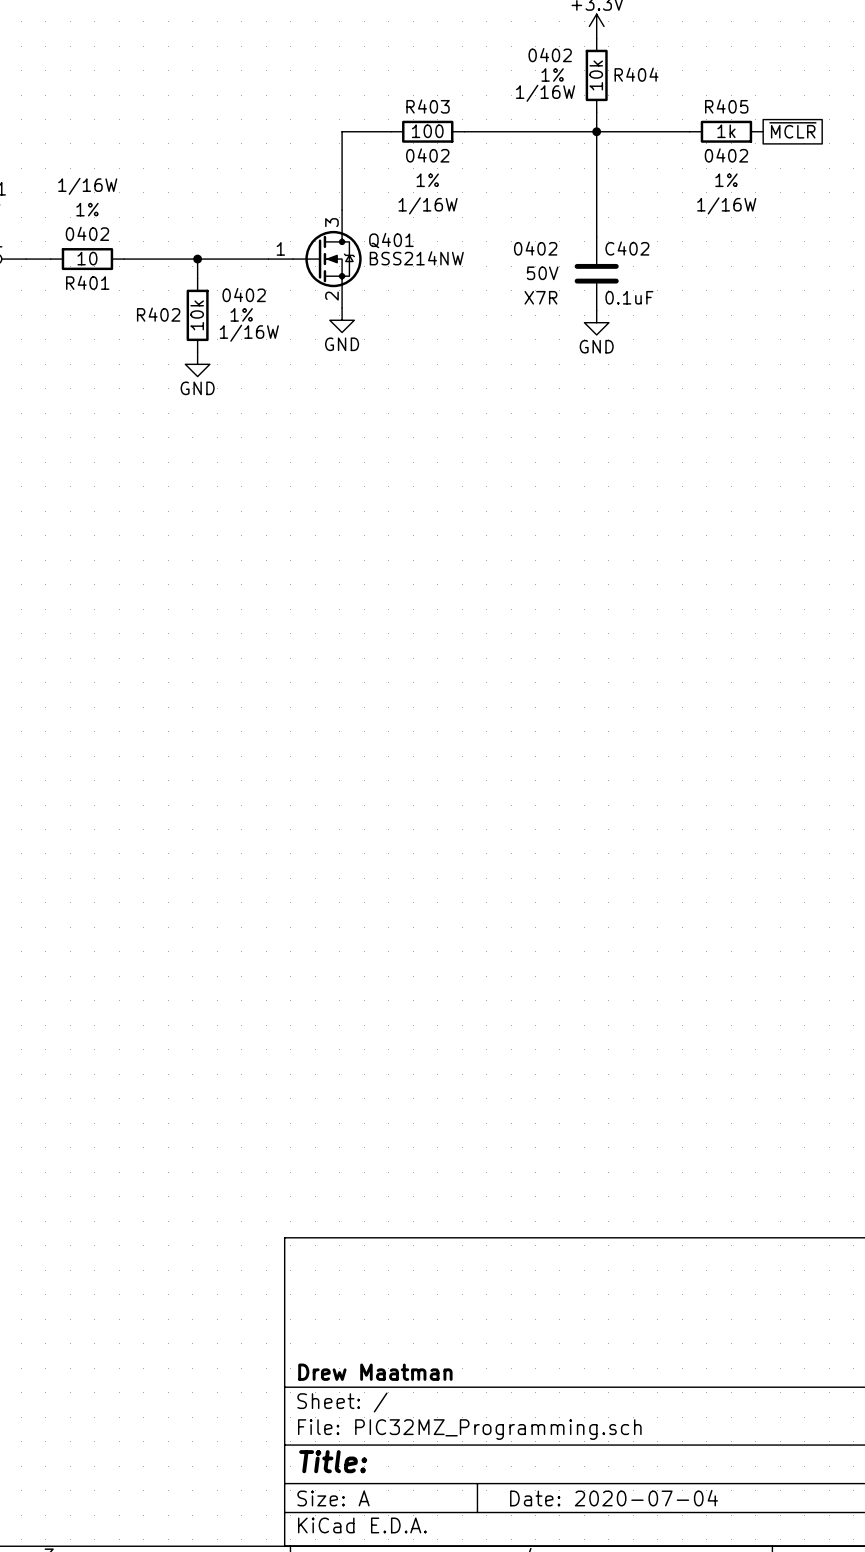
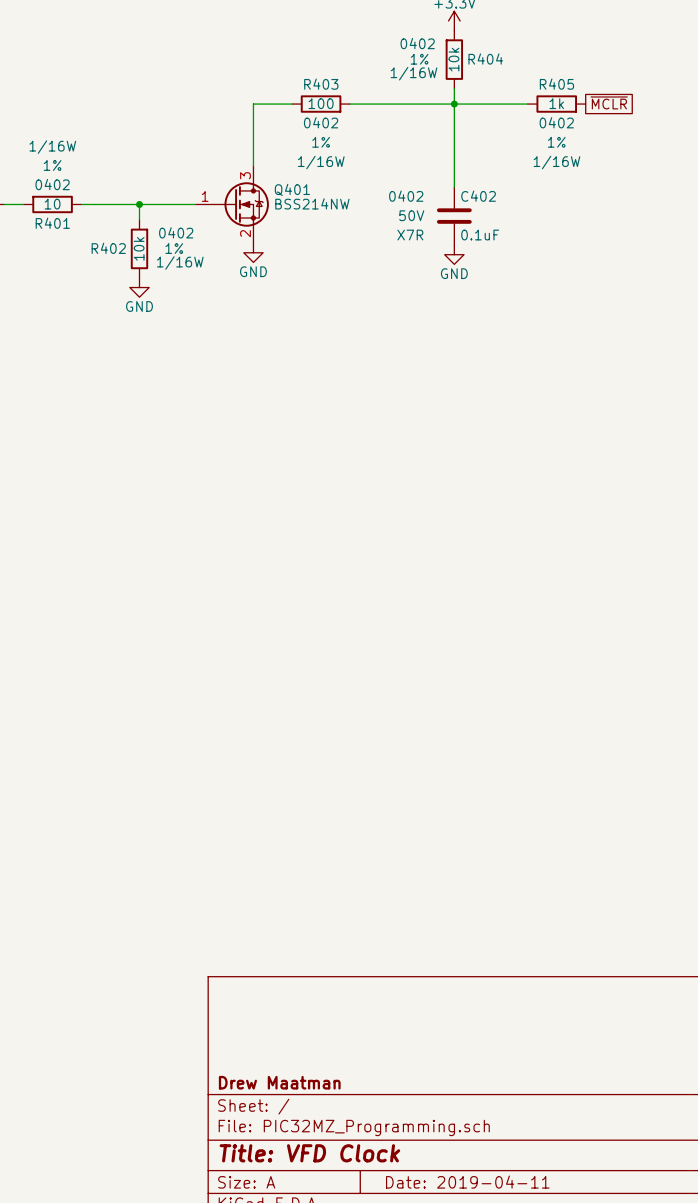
title block: Title: (333, 1461) -> Title: VFD Clock (309, 1153)
title block: Date: 2020-07-04 (614, 1498) -> Date: 2019-04-11 (467, 1182)

